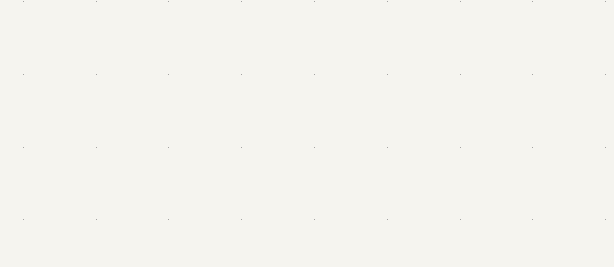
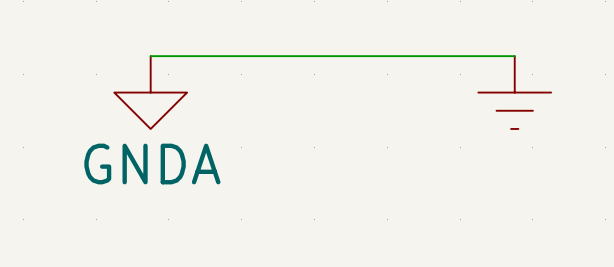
wire: none -> (150, 56) (514, 56)
power symbol: none -> GNDA (150, 92)
power symbol: none -> (514, 92)

